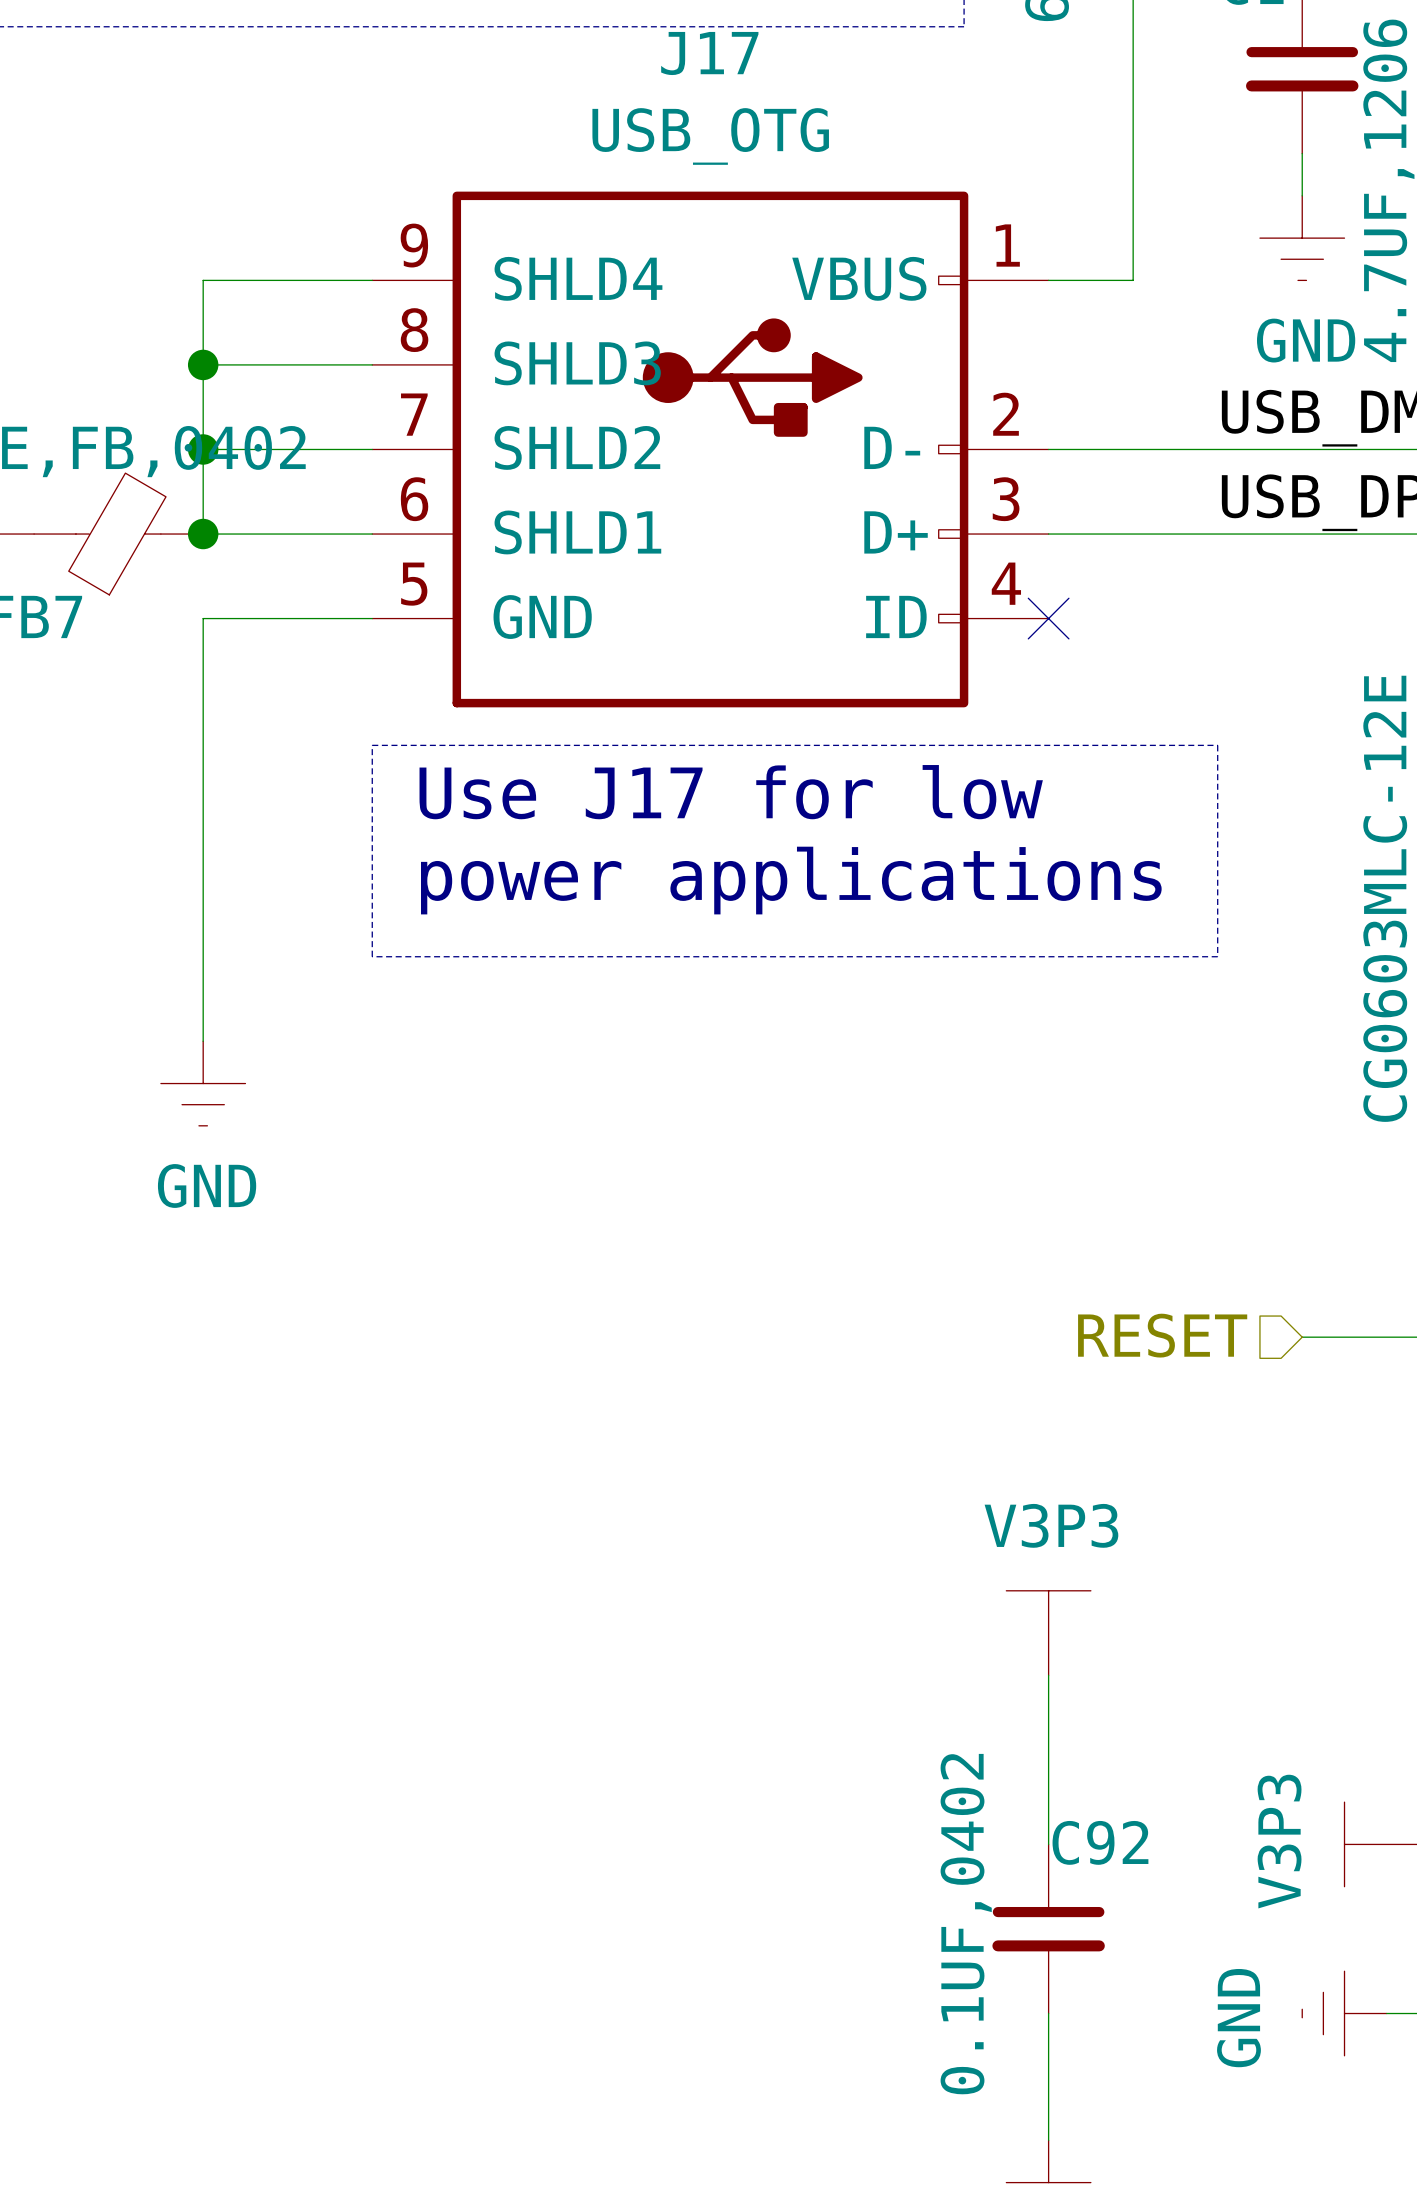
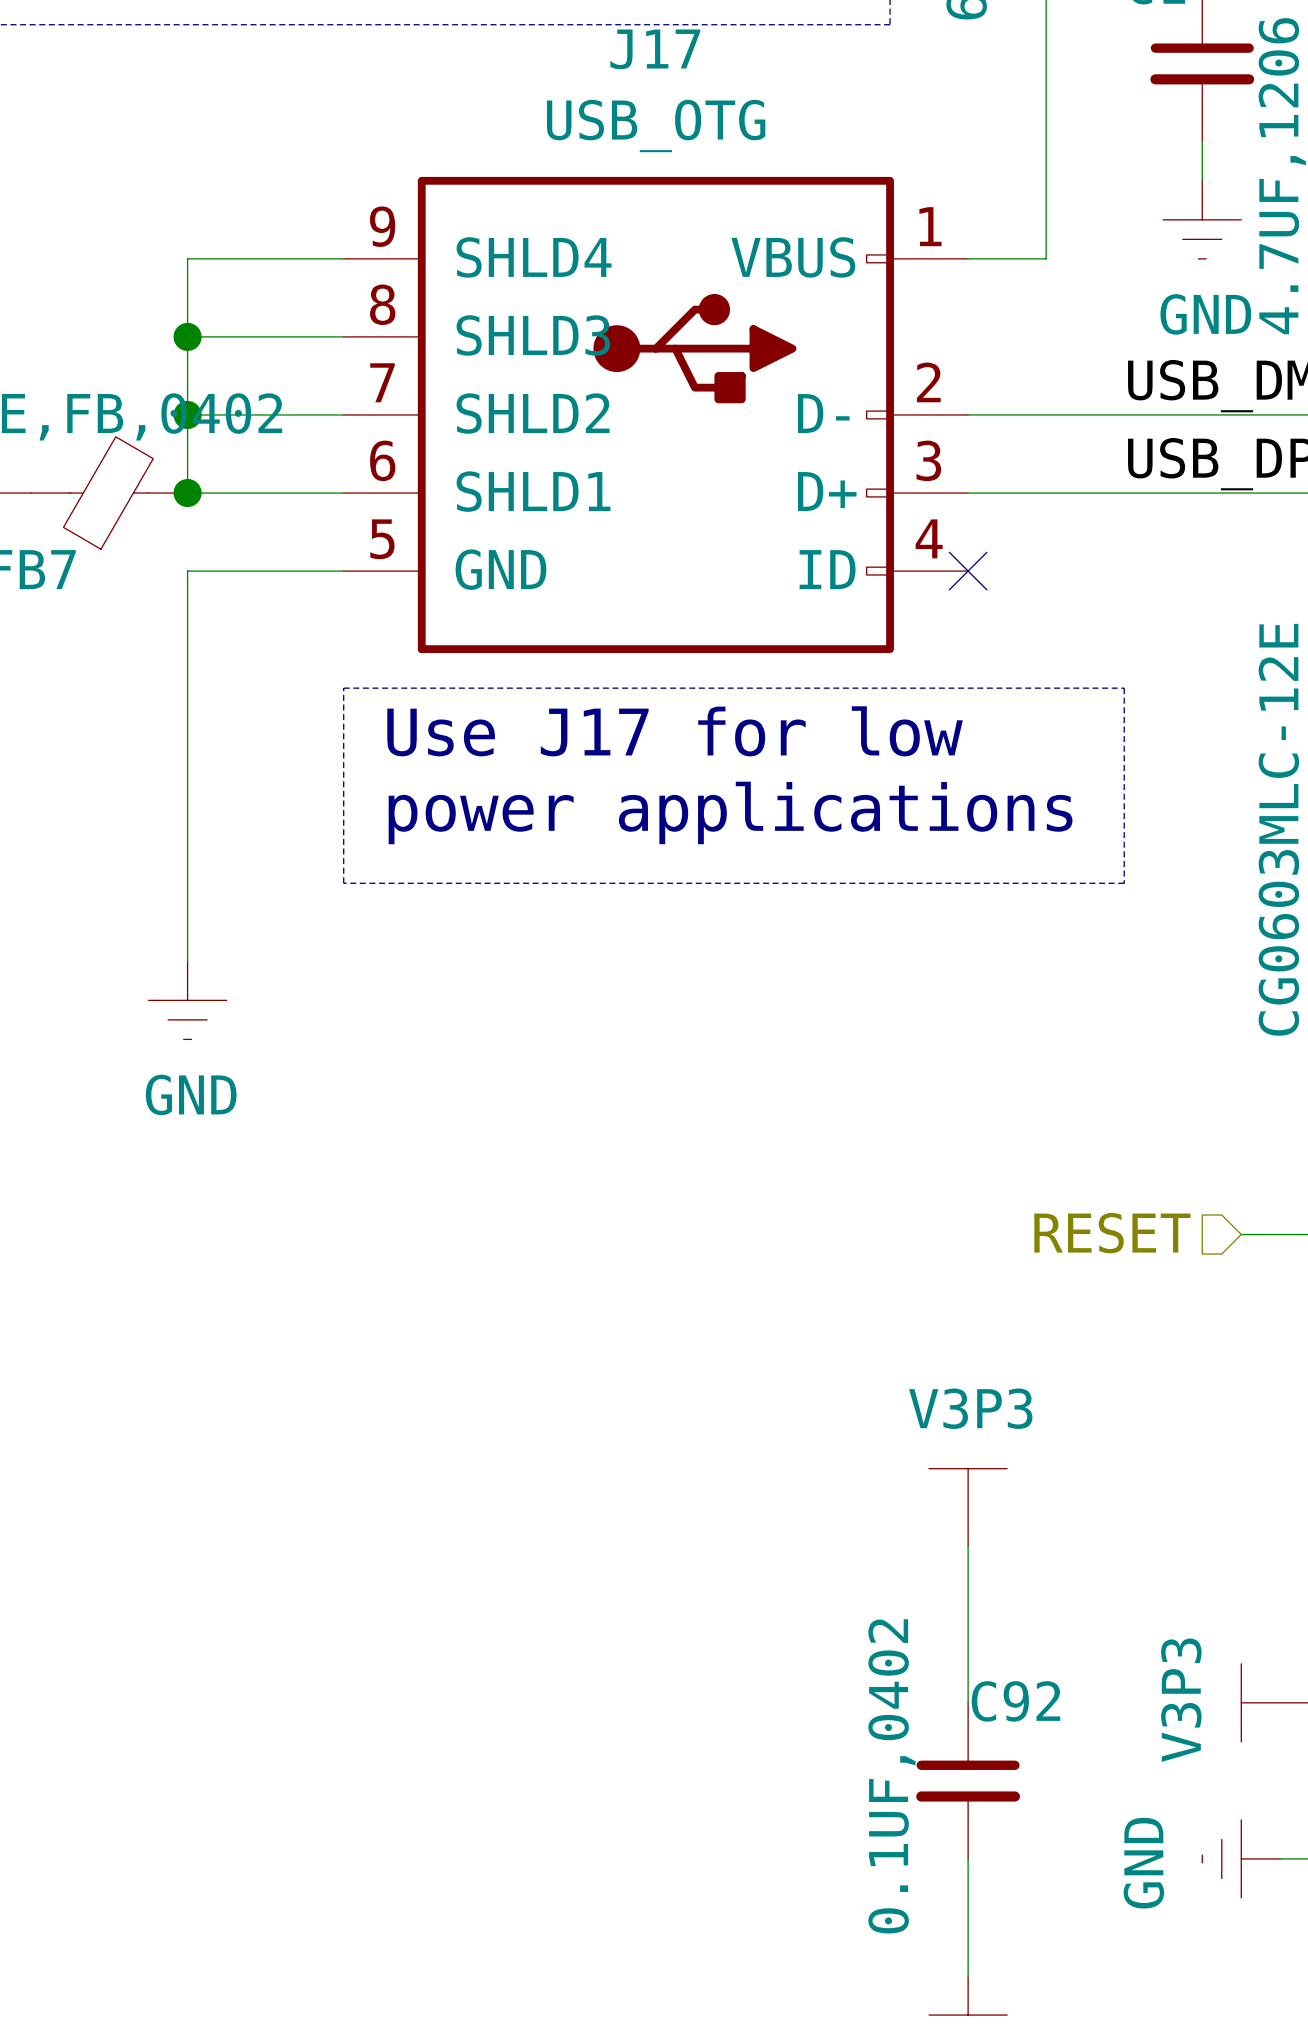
hierarchical label position: RESET (1162, 1335) -> RESET (1112, 1233)
wire: (1302, 1337) (1344, 1337) -> none

